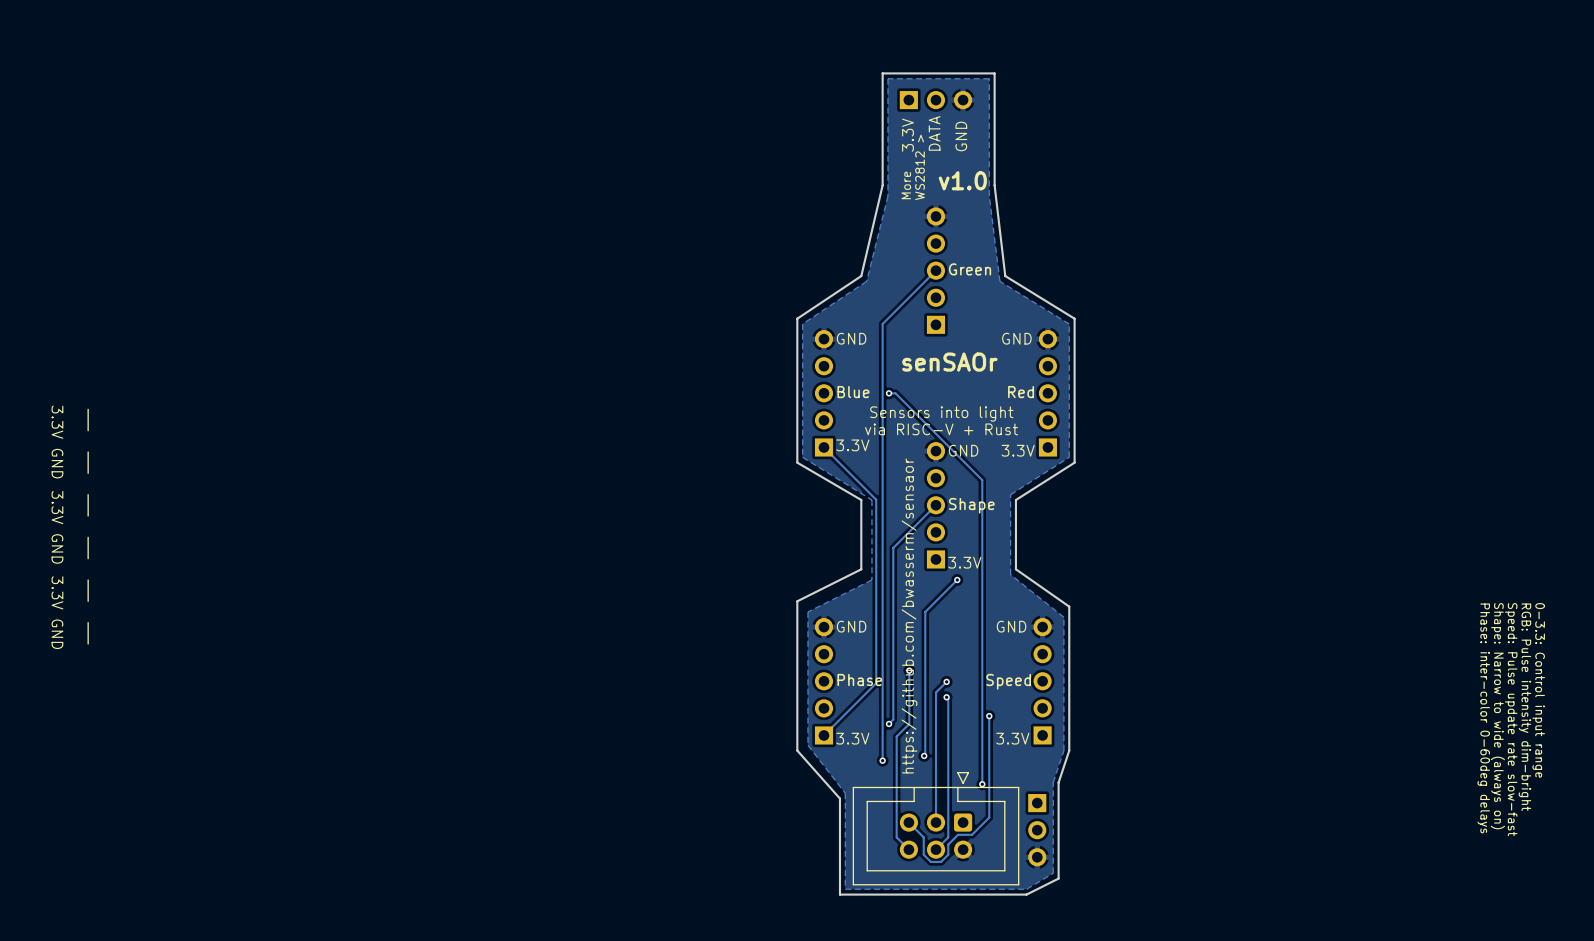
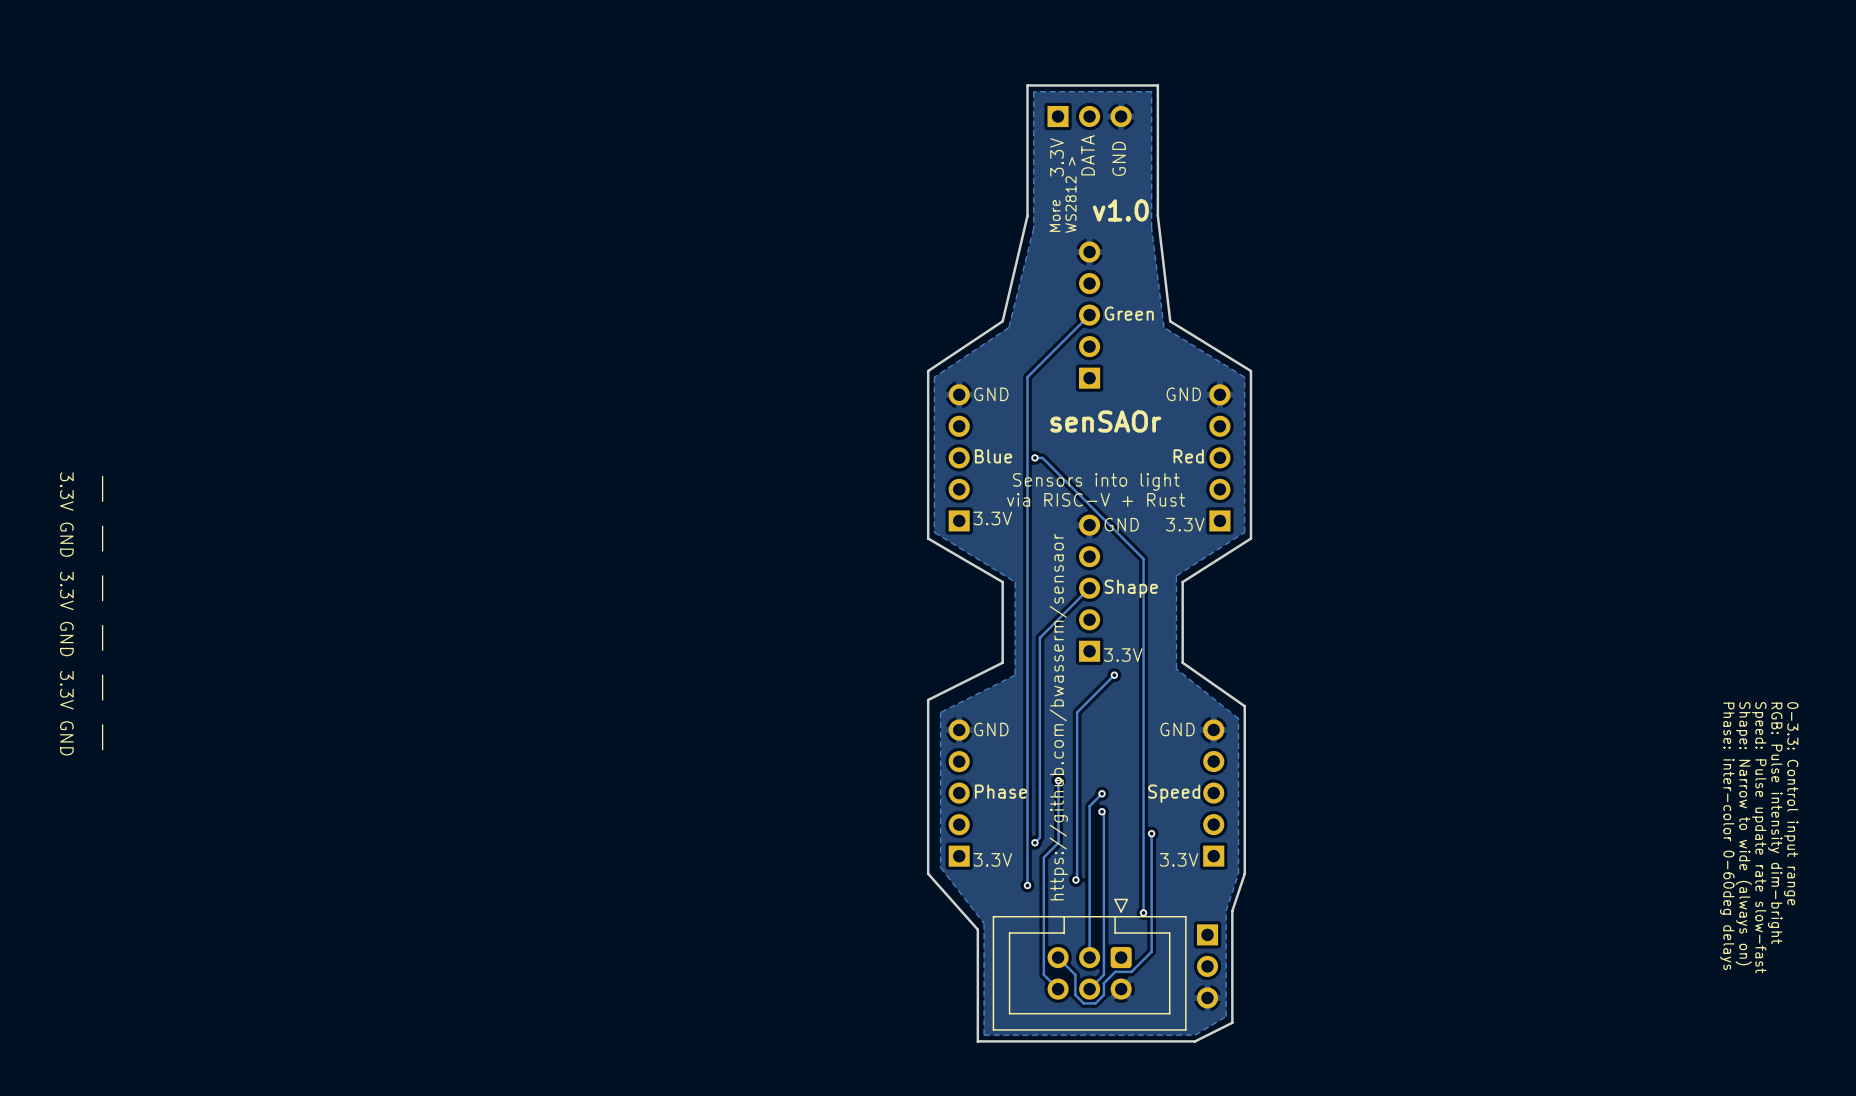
track: (823, 447) (876, 499) (876, 683) (823, 735) -> none

